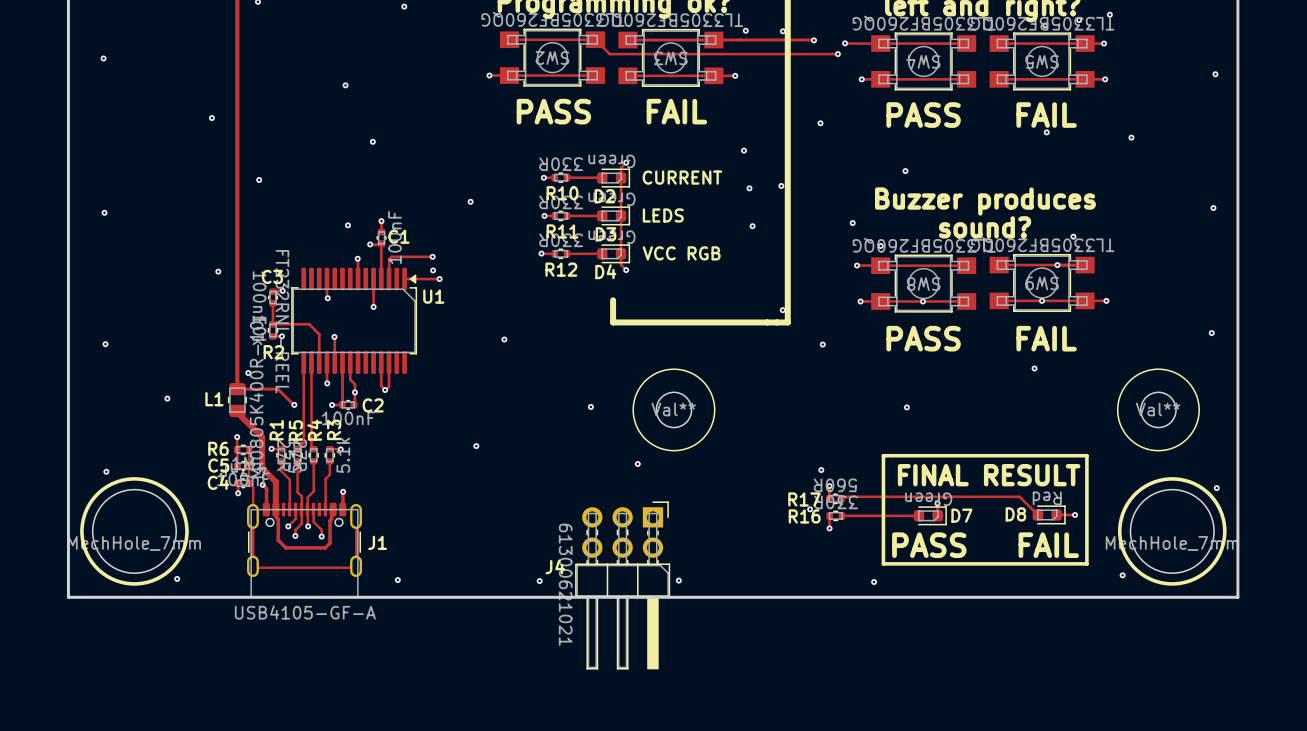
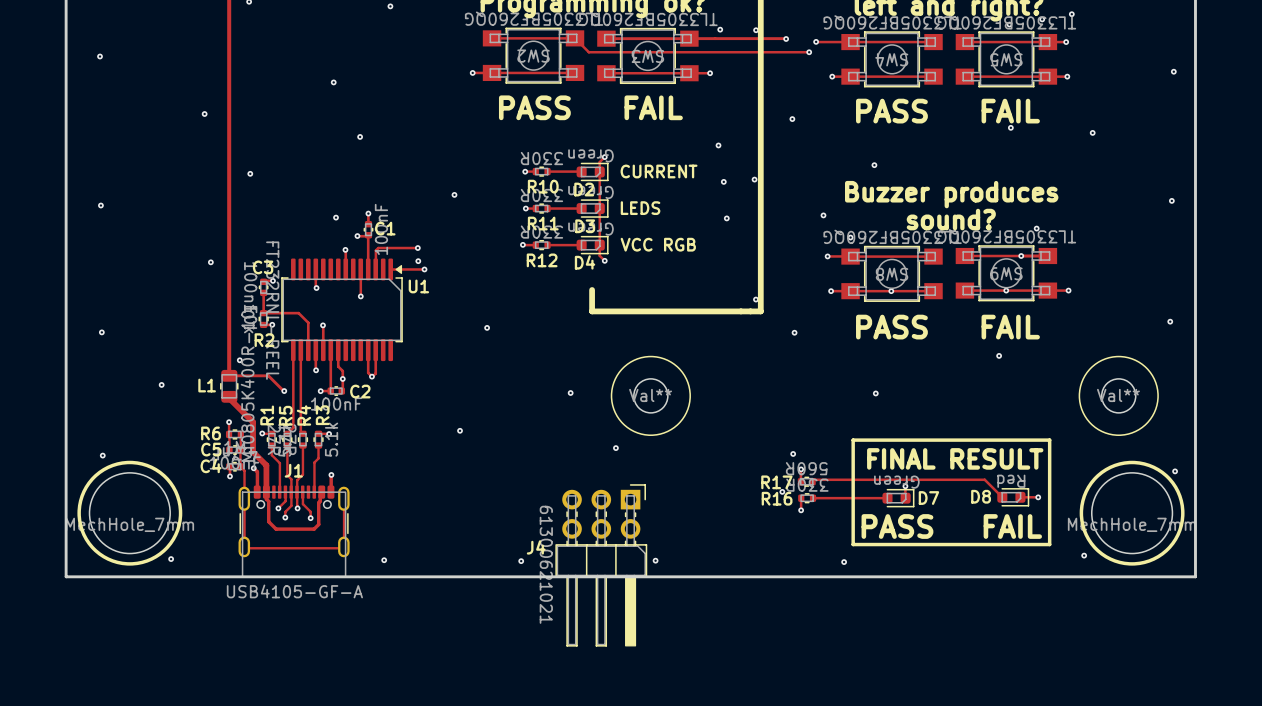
J1 name position: J1 (377, 542) -> J1 (293, 470)

